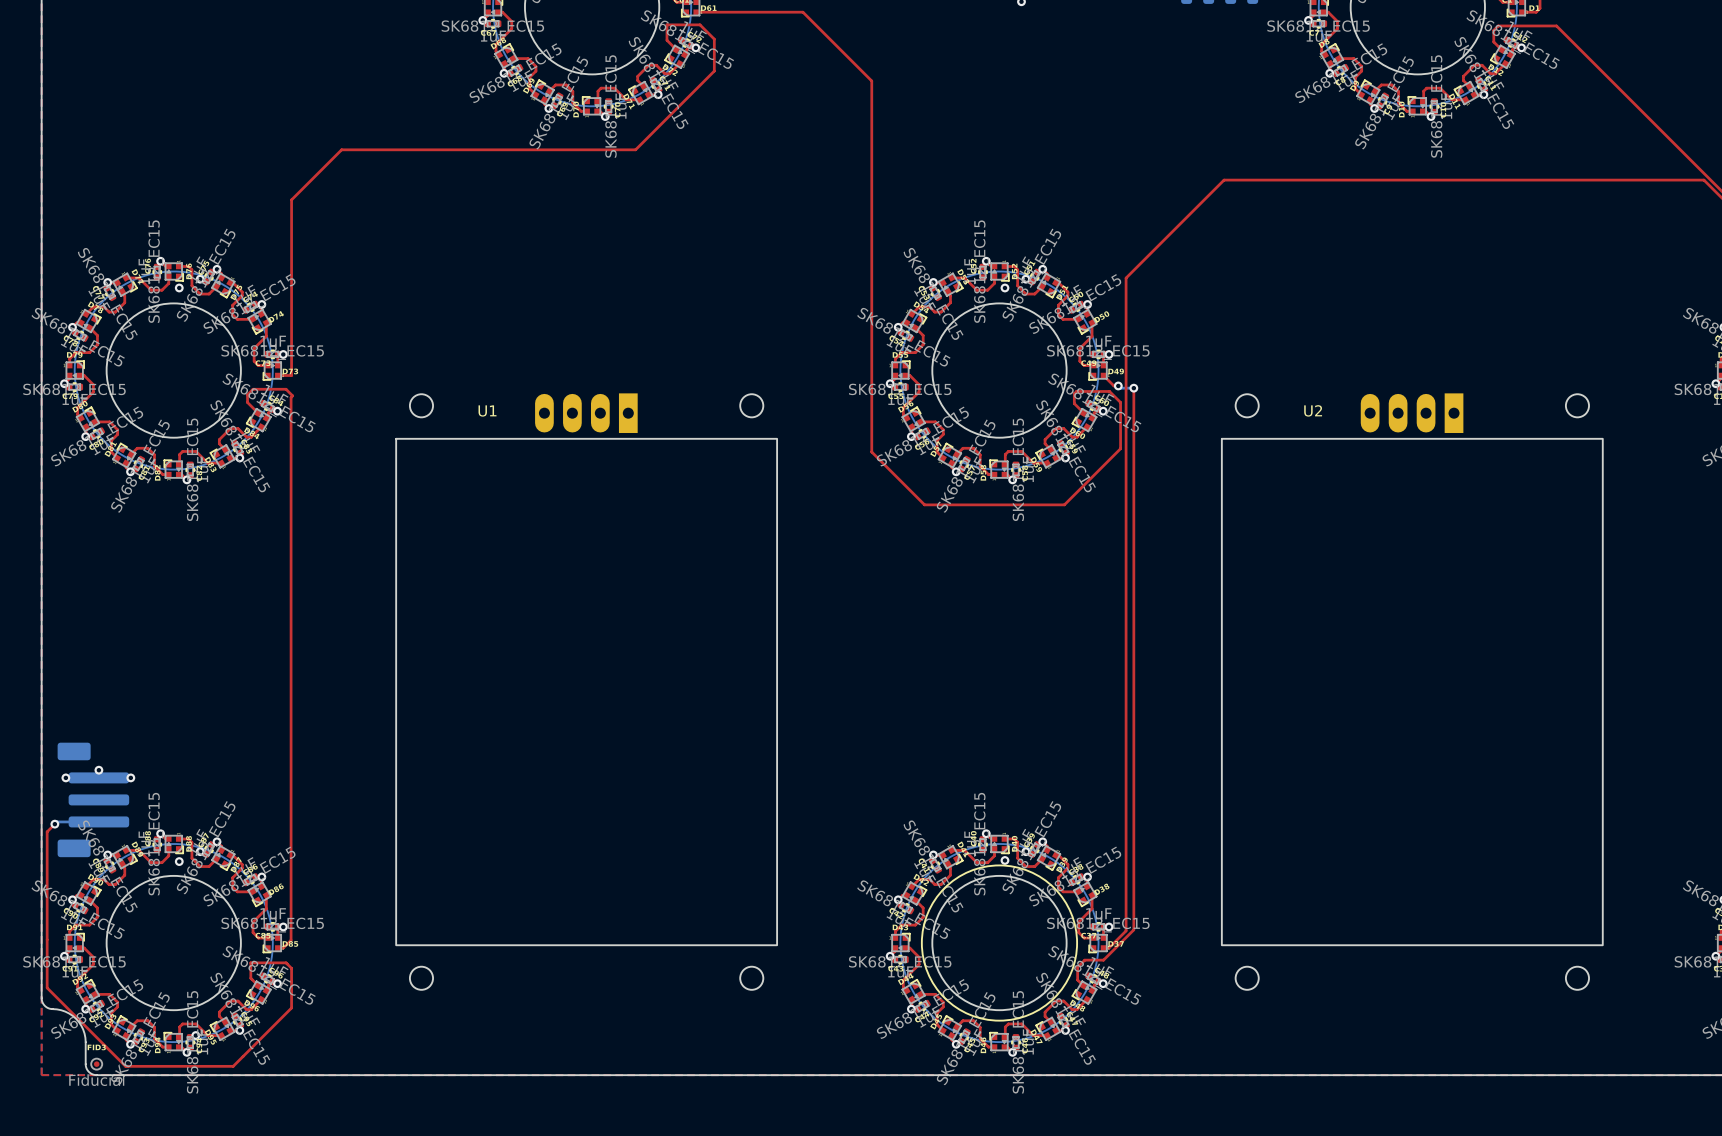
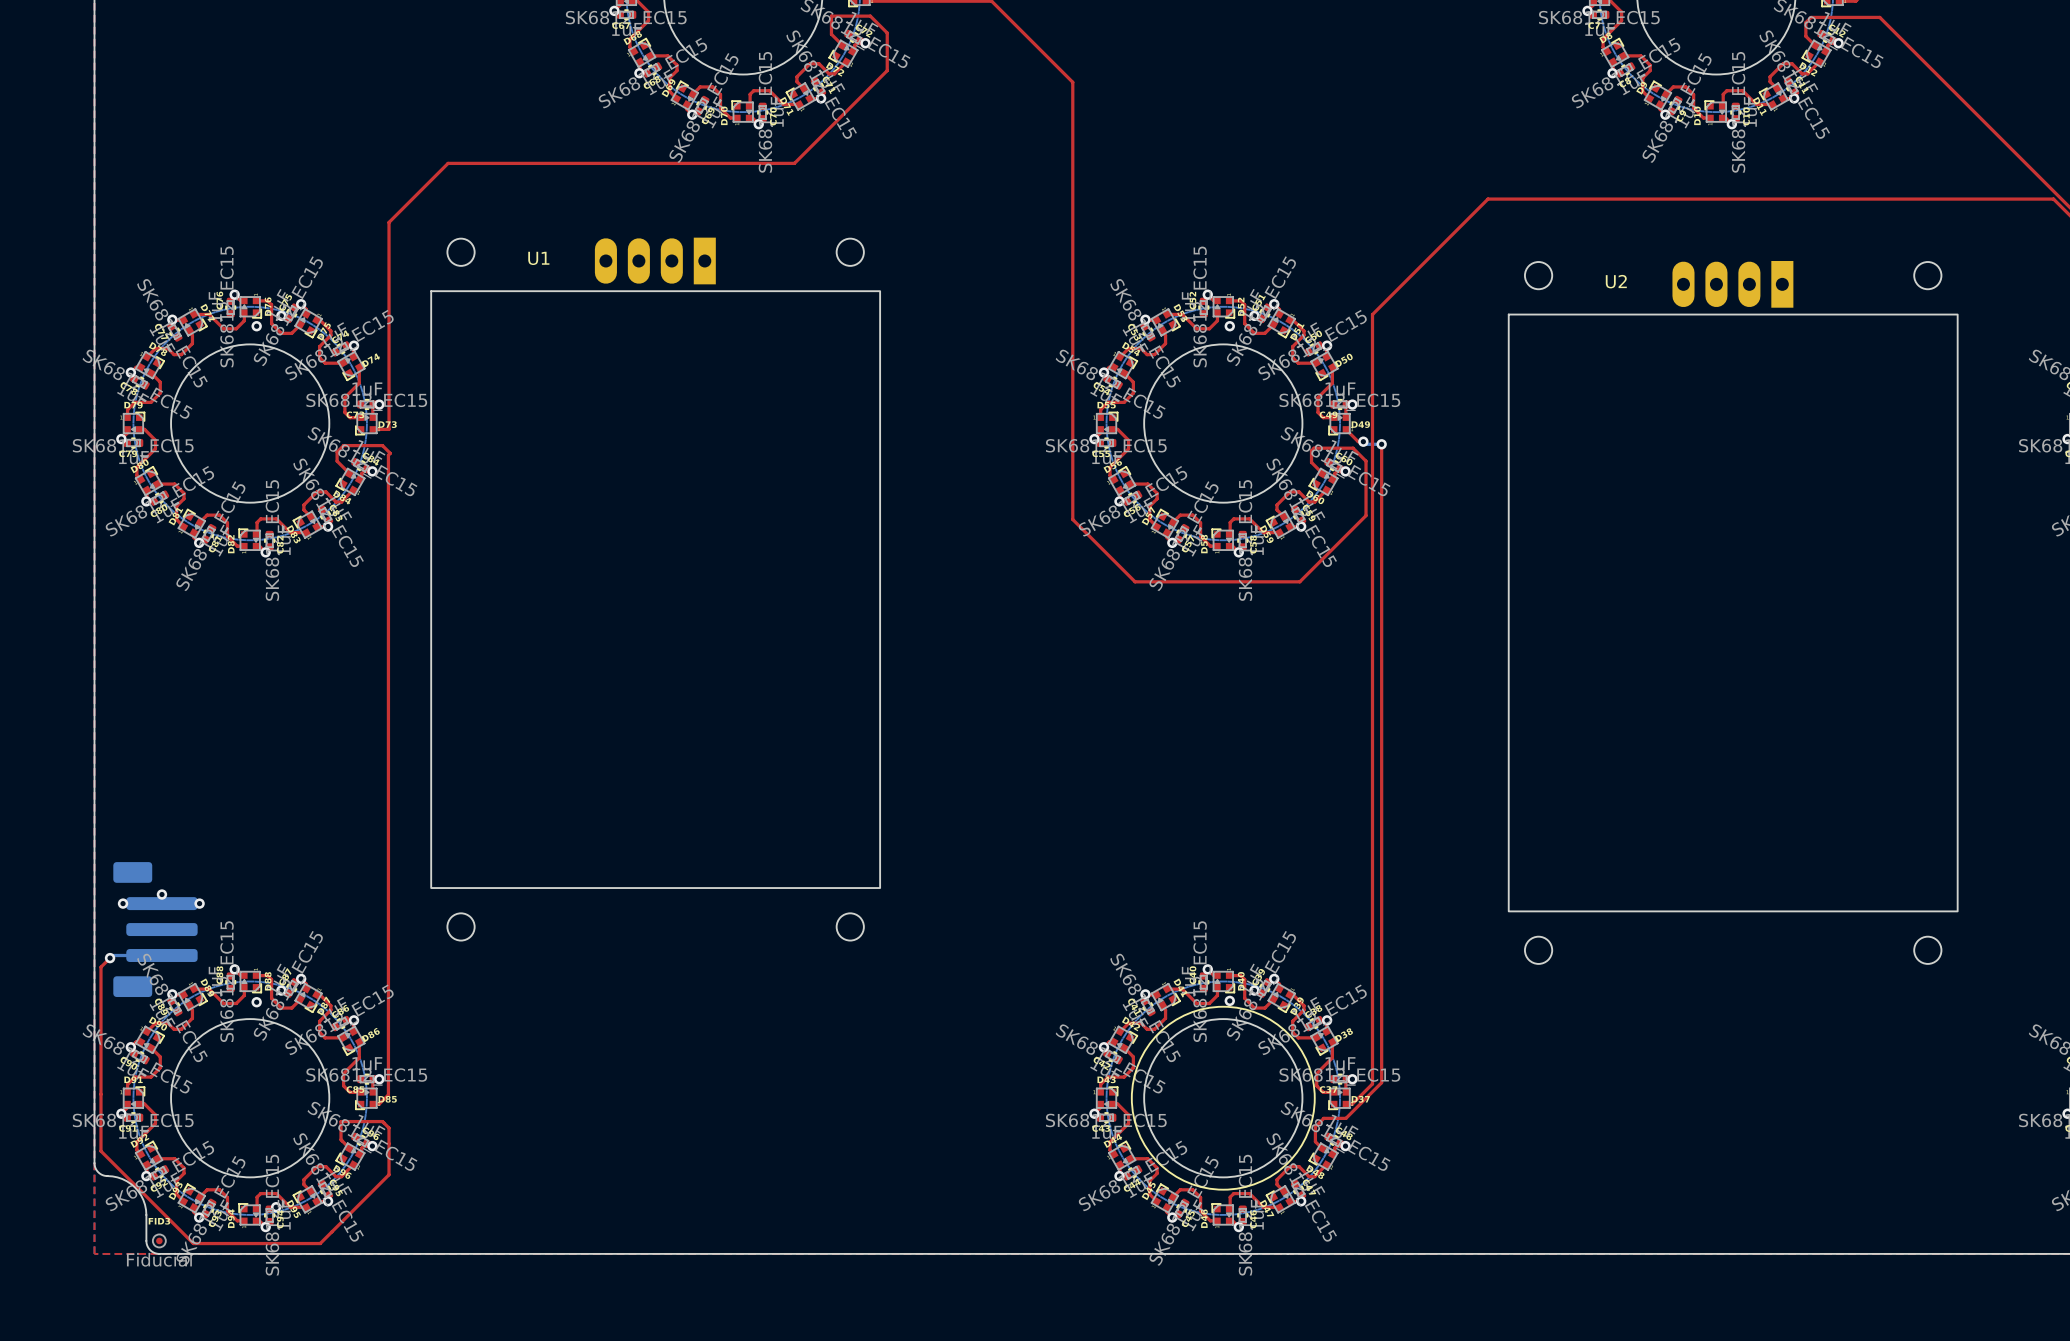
U1 position: (586, 691) -> (655, 589)
U2 position: (1412, 691) -> (1733, 612)

